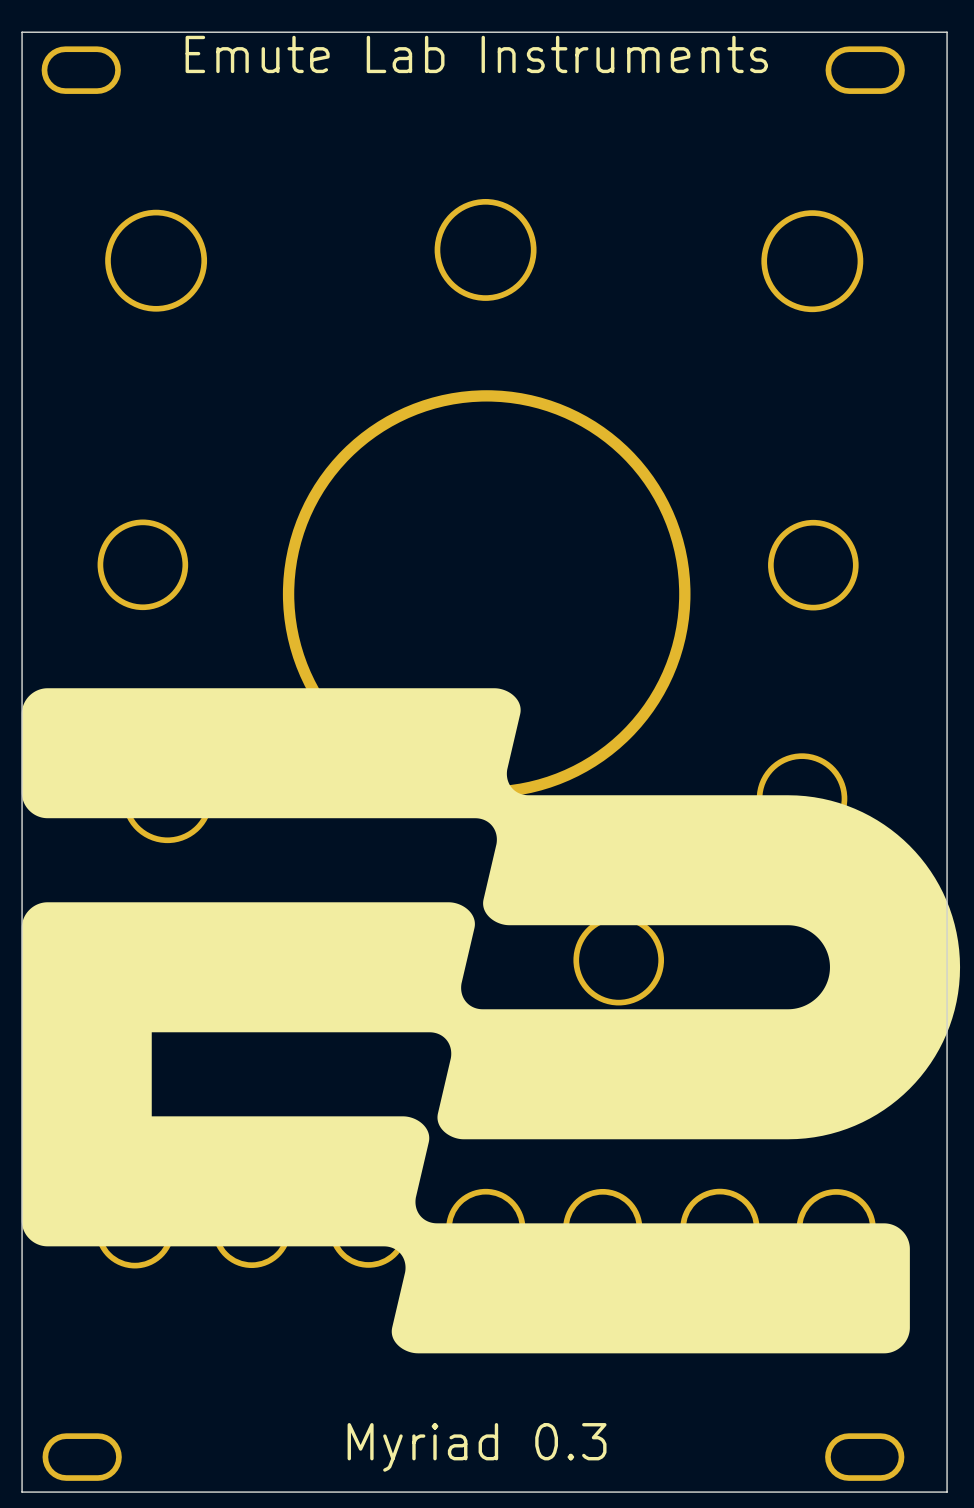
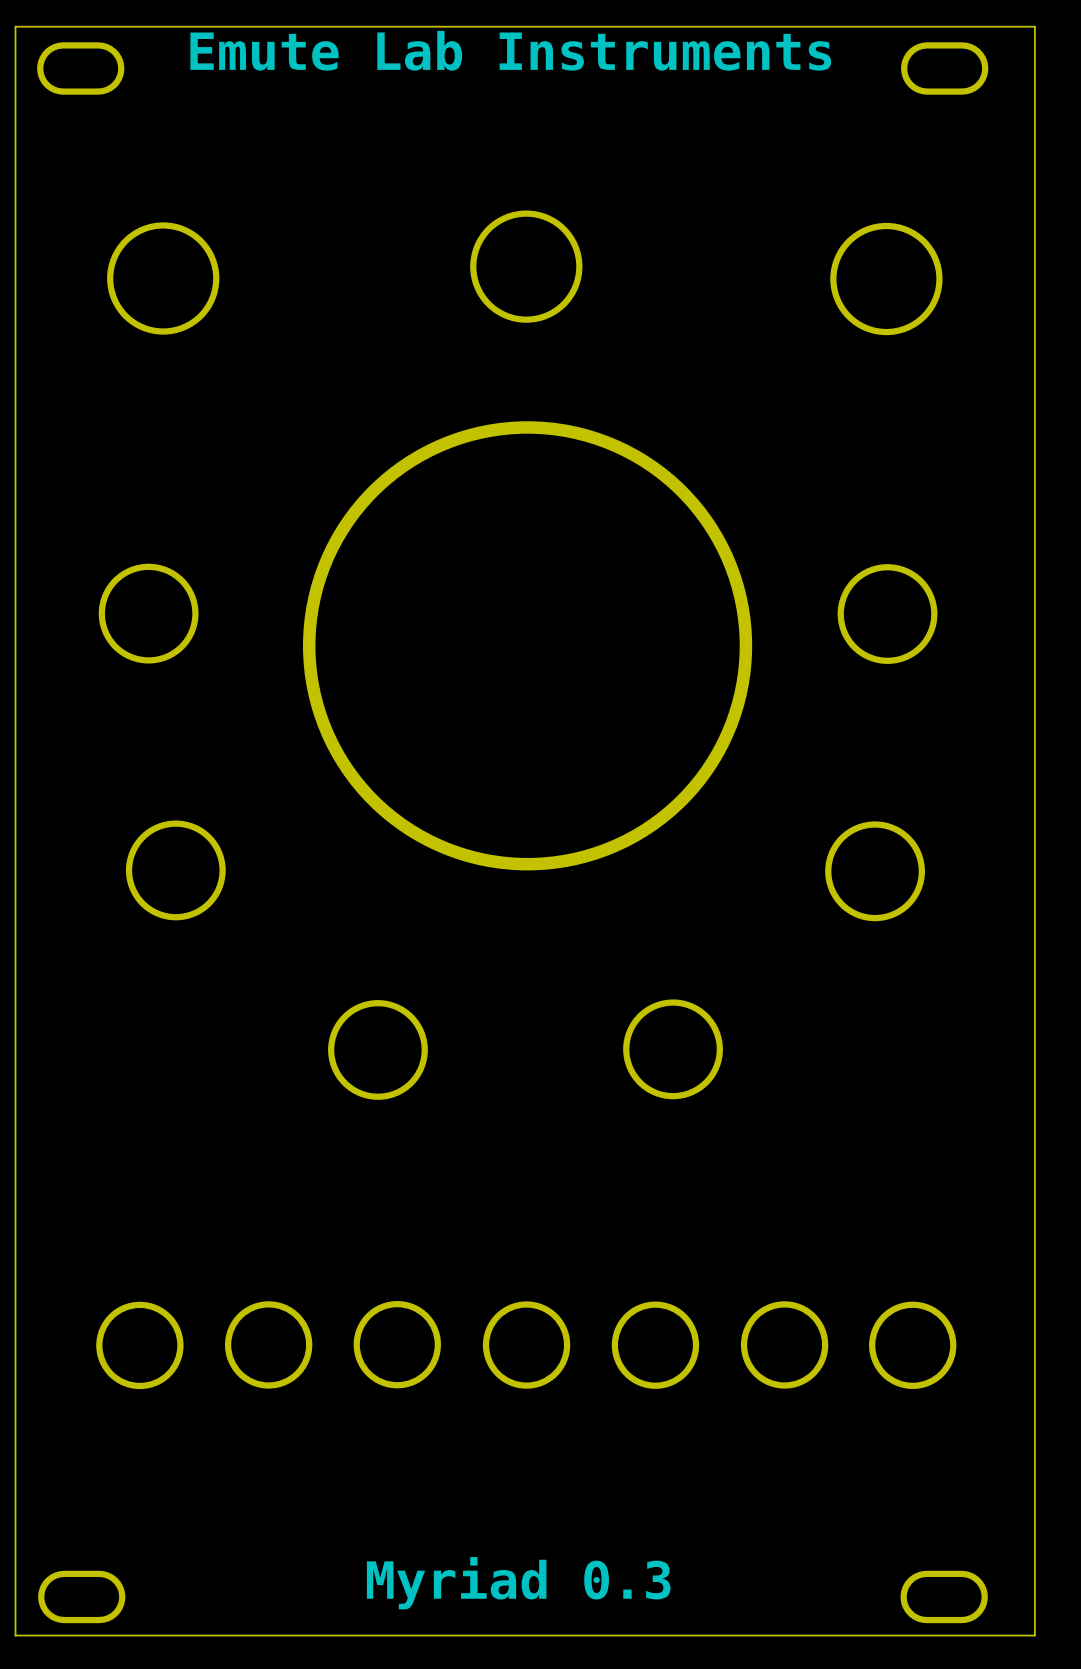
drawing: [21, 688, 961, 1354] -> none

